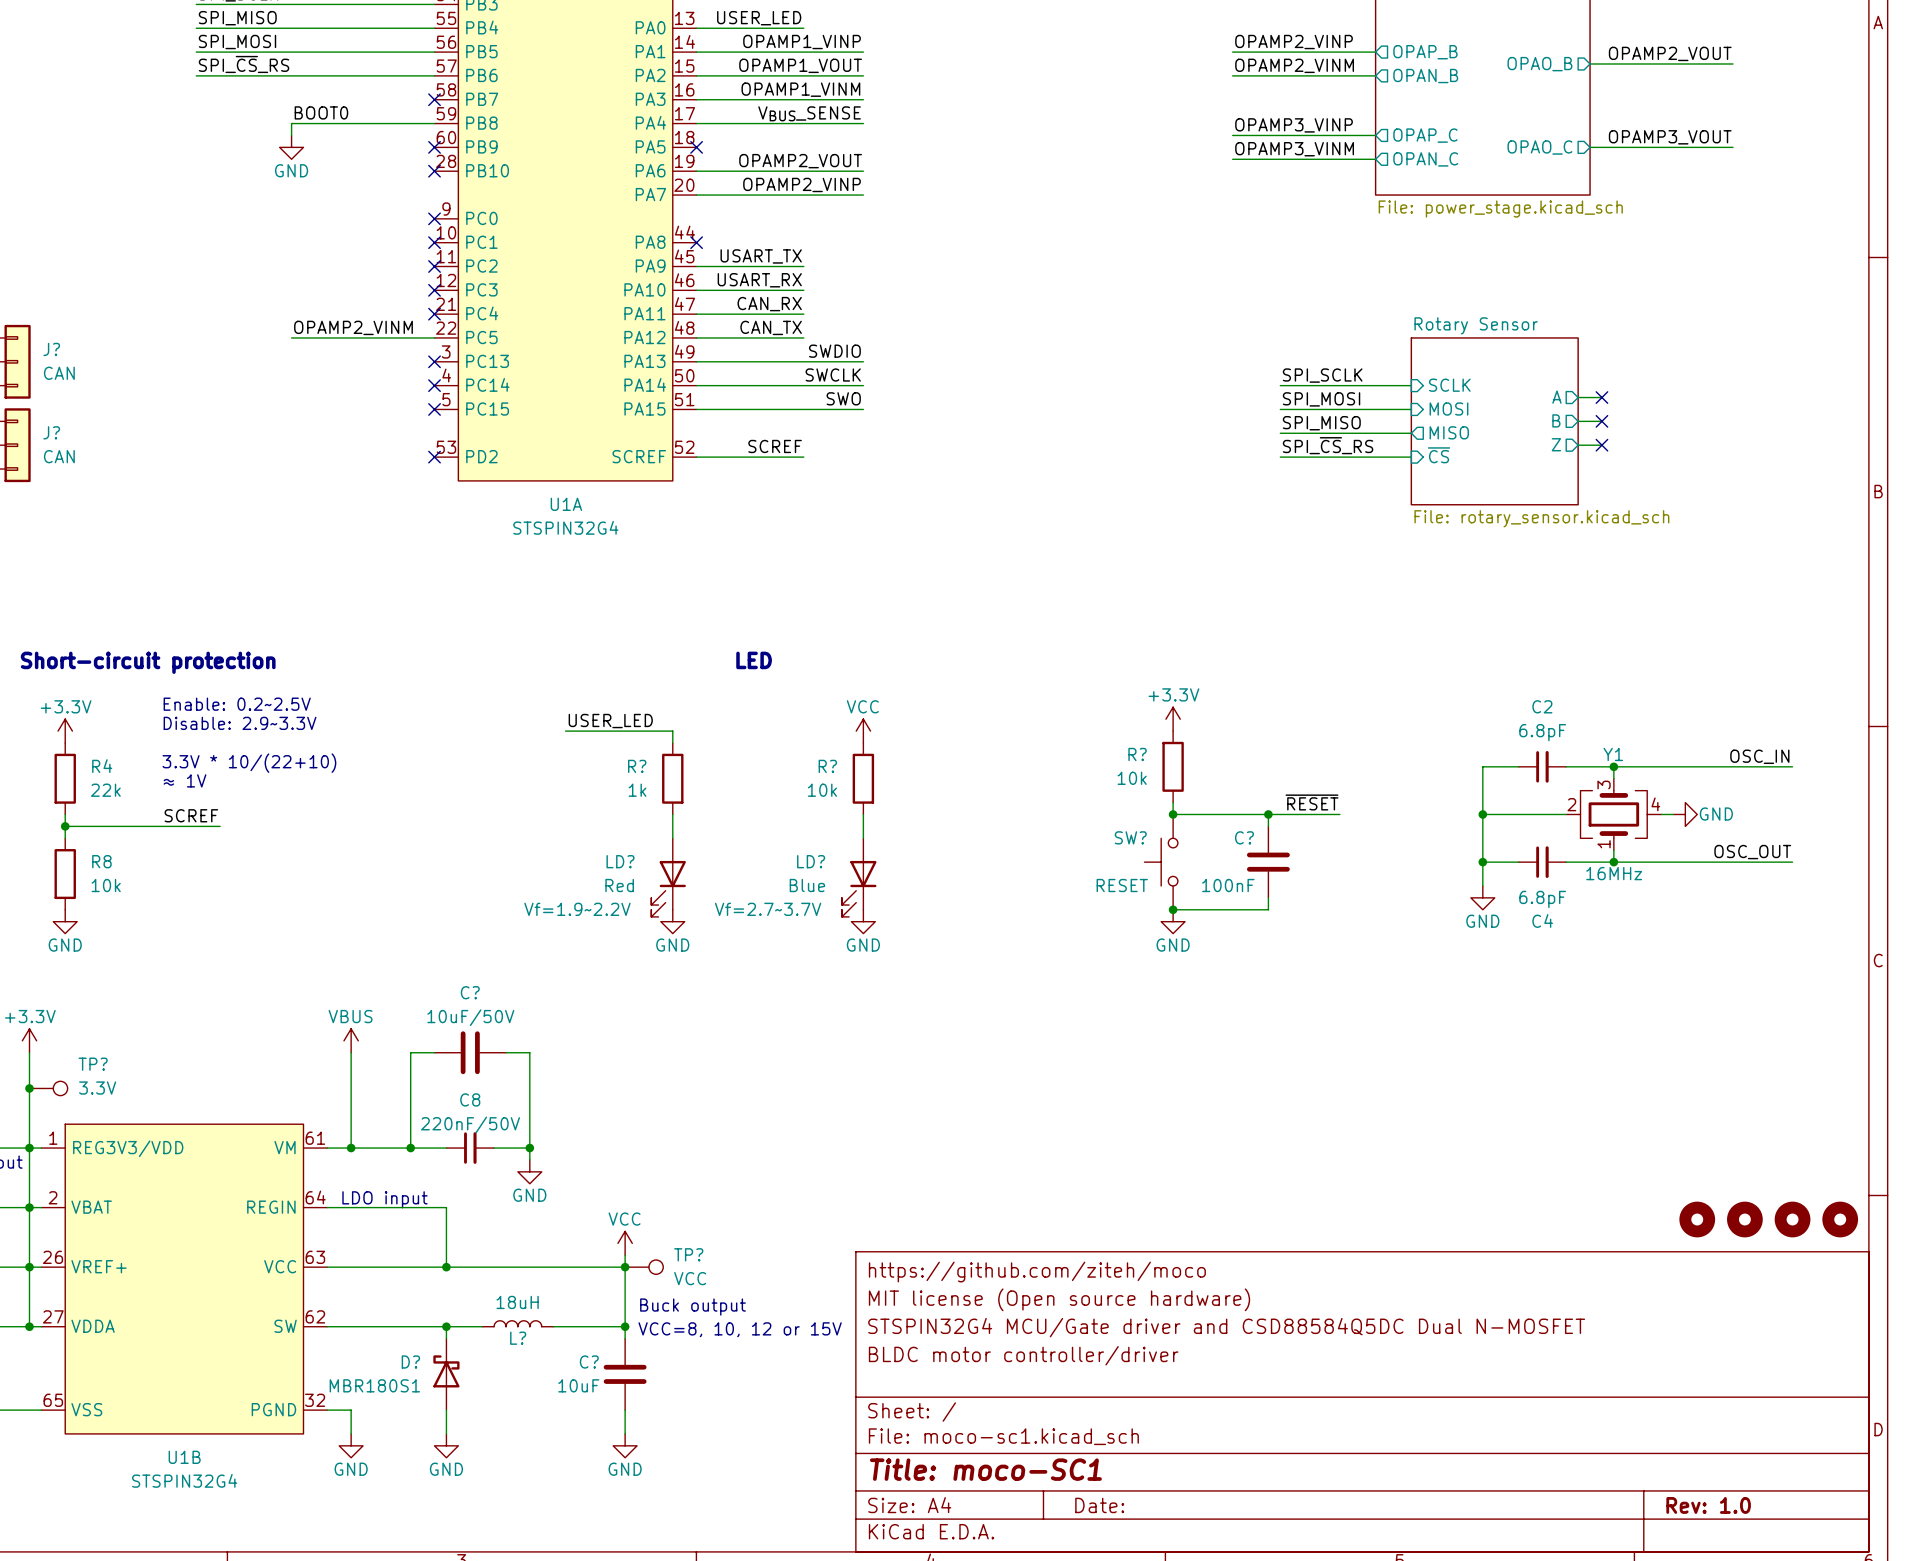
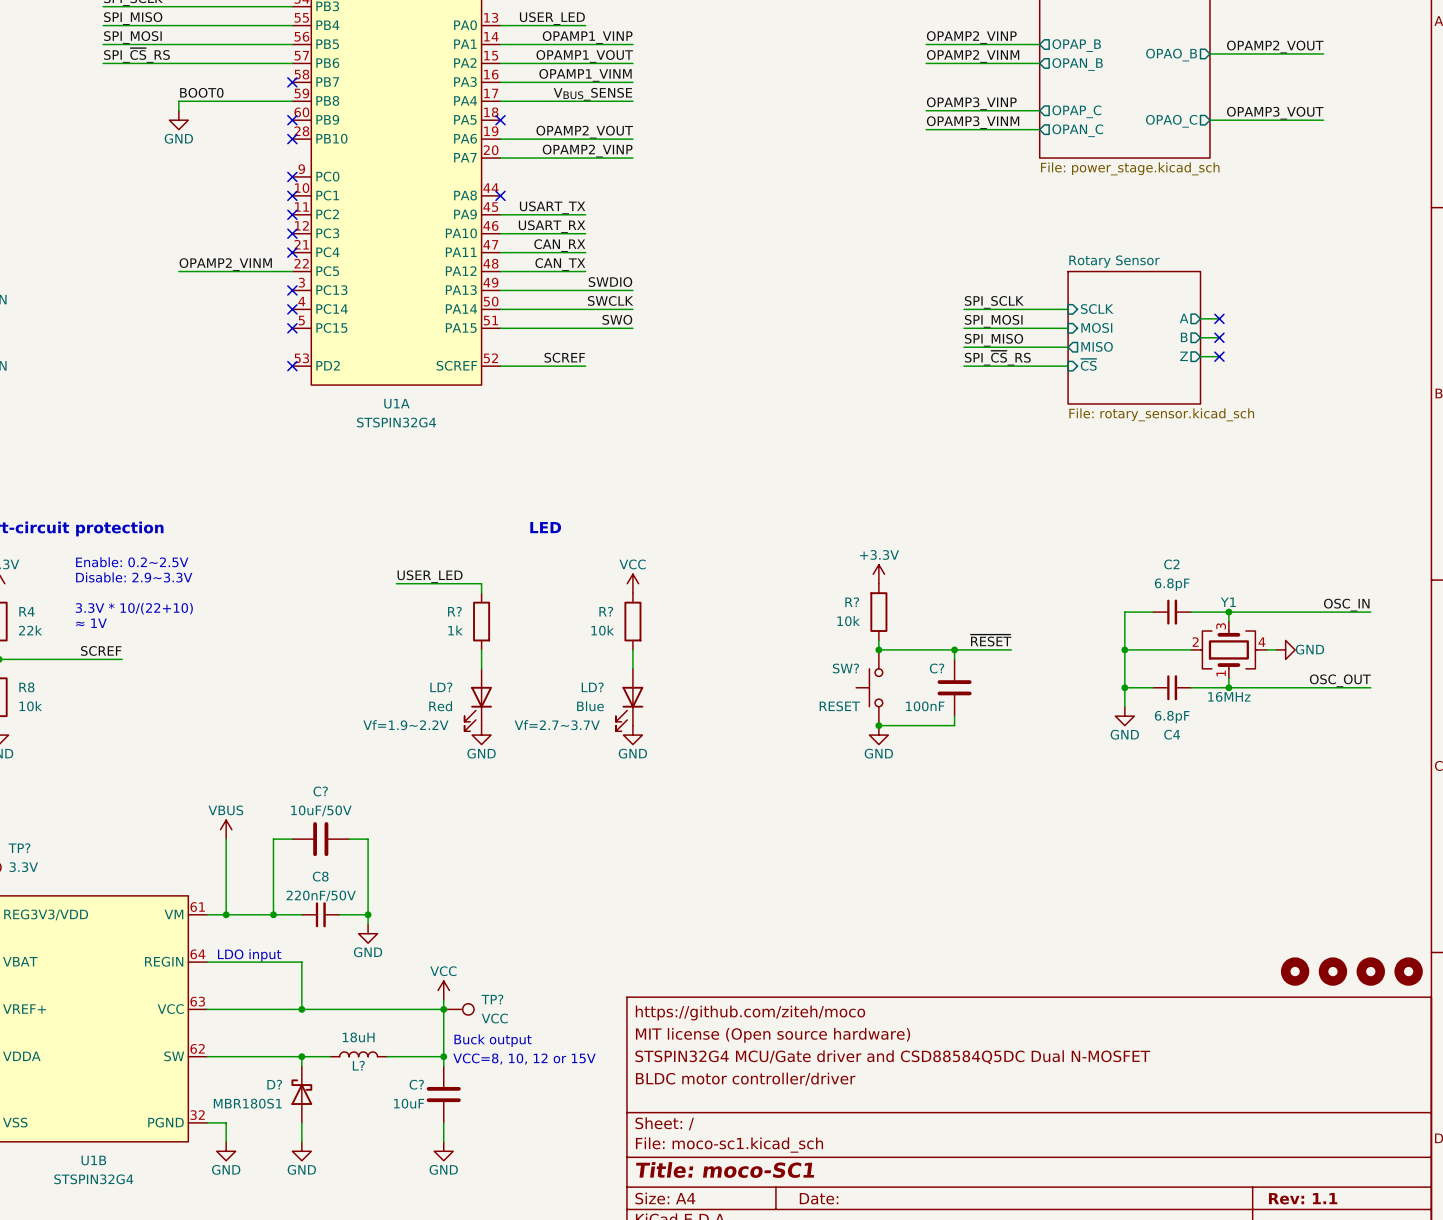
title block: Rev: 1.0 (1708, 1505) -> Rev: 1.1 (1303, 1198)

